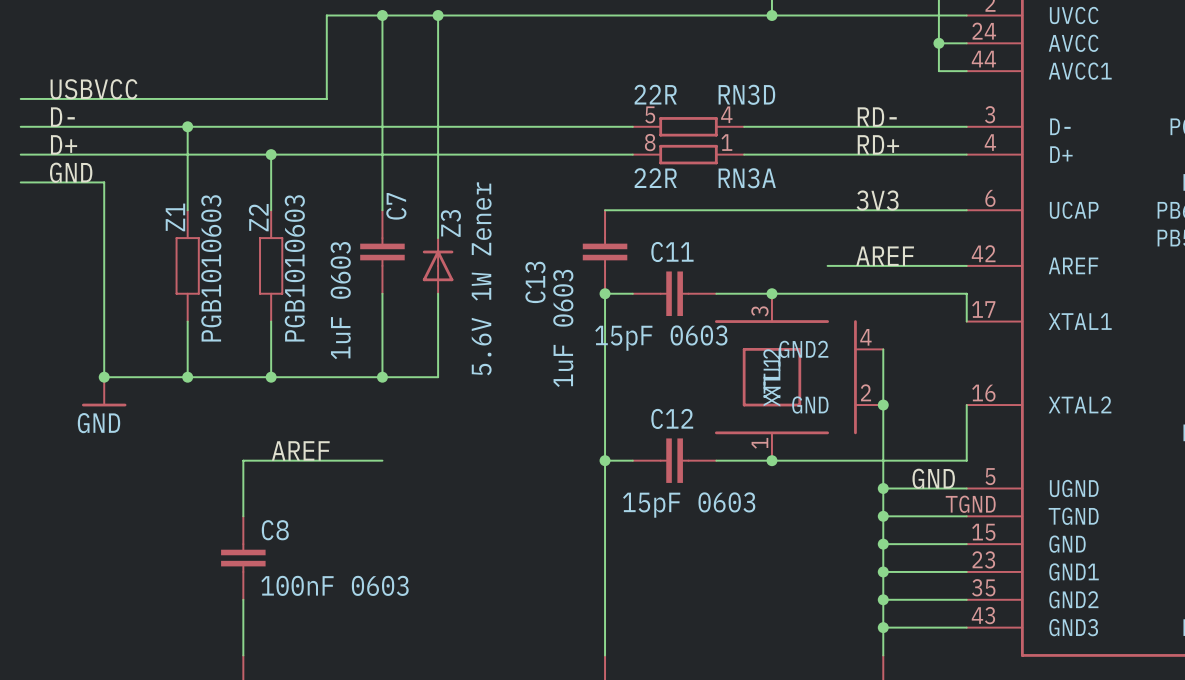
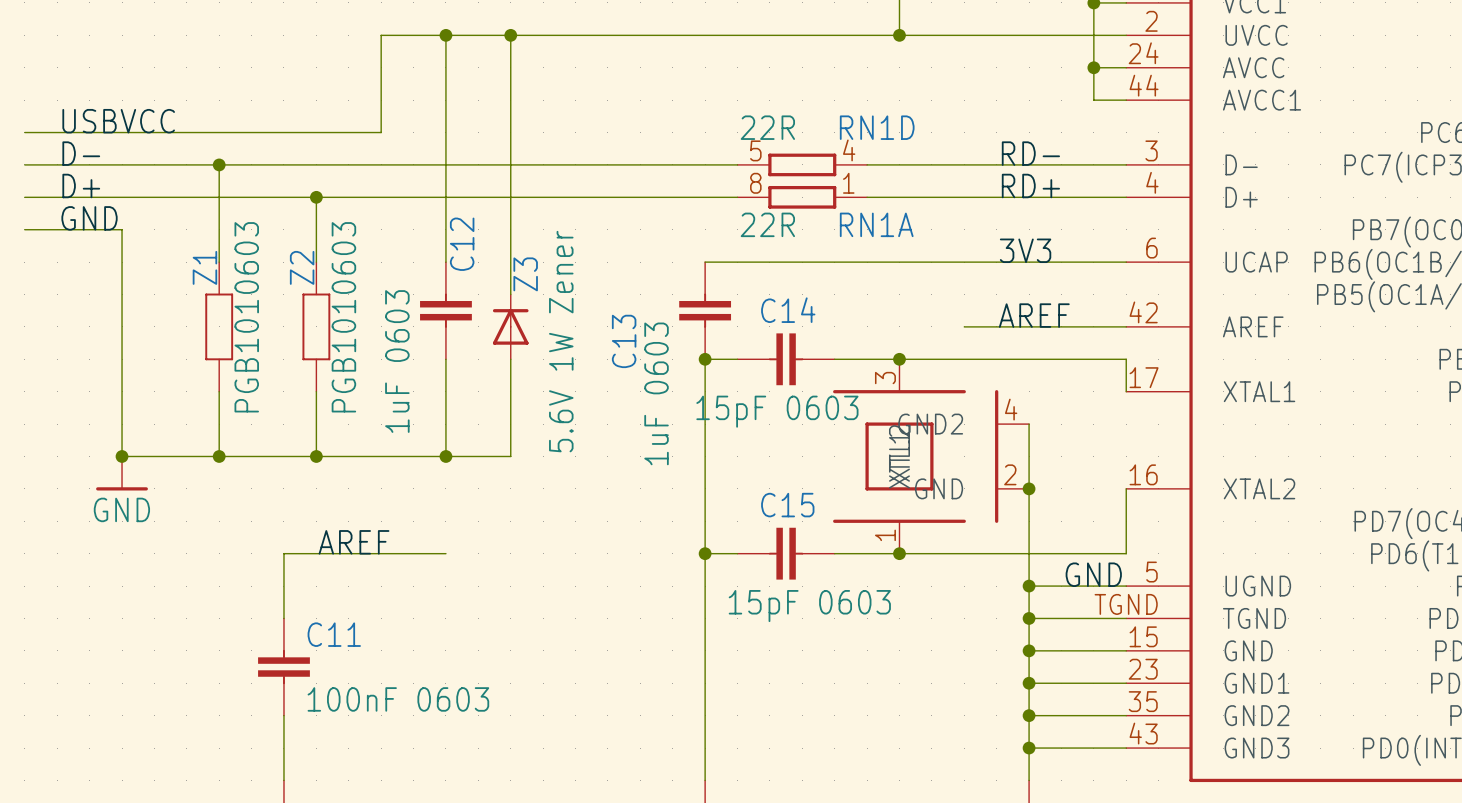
RN3D name: RN3D (746, 94) -> RN1D (877, 127)
RN3A name: RN3A (747, 178) -> RN1A (876, 224)
C7 name: C7 (396, 206) -> C12 (462, 244)
C11 name: C11 (672, 252) -> C14 (788, 310)
C12 name: C12 (672, 418) -> C15 (787, 505)
C8 name: C8 (275, 530) -> C11 (334, 634)

